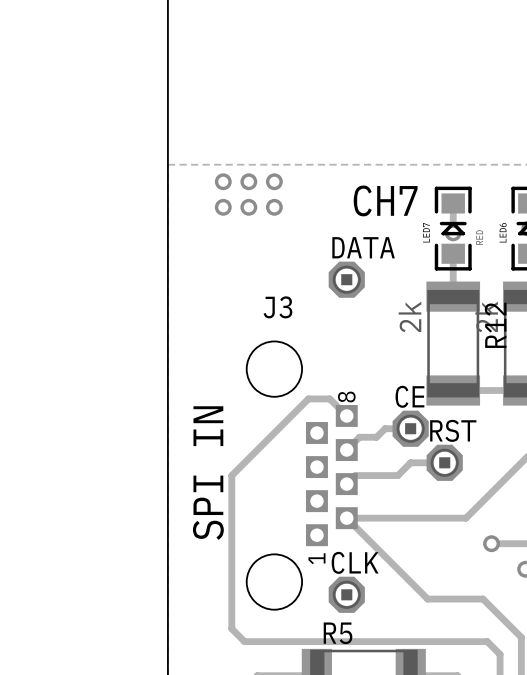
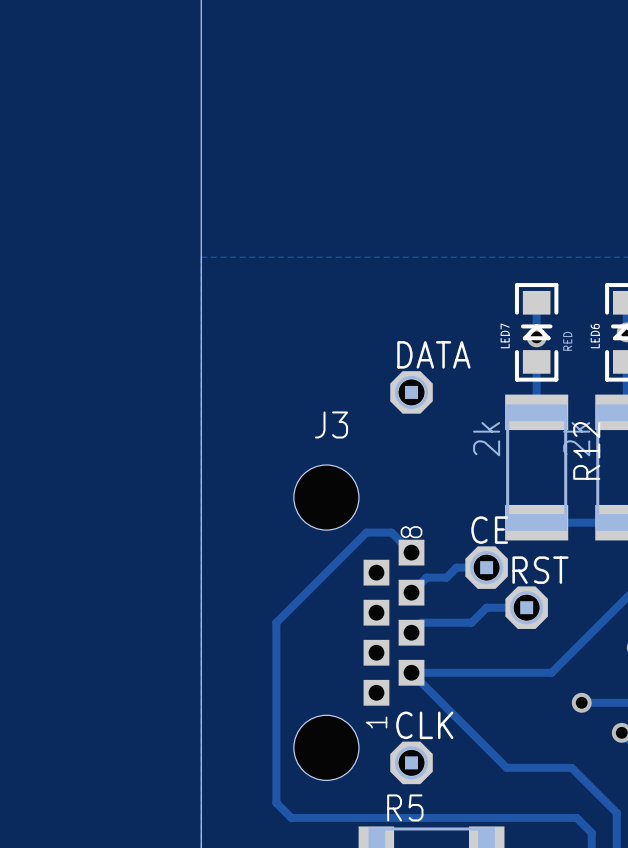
via: (223, 181) -> none
via: (248, 181) -> none
via: (274, 181) -> none
text: CH7 (385, 200) -> none
via: (223, 207) -> none
via: (248, 207) -> none
via: (274, 207) -> none
text: SPI IN (208, 473) -> none

